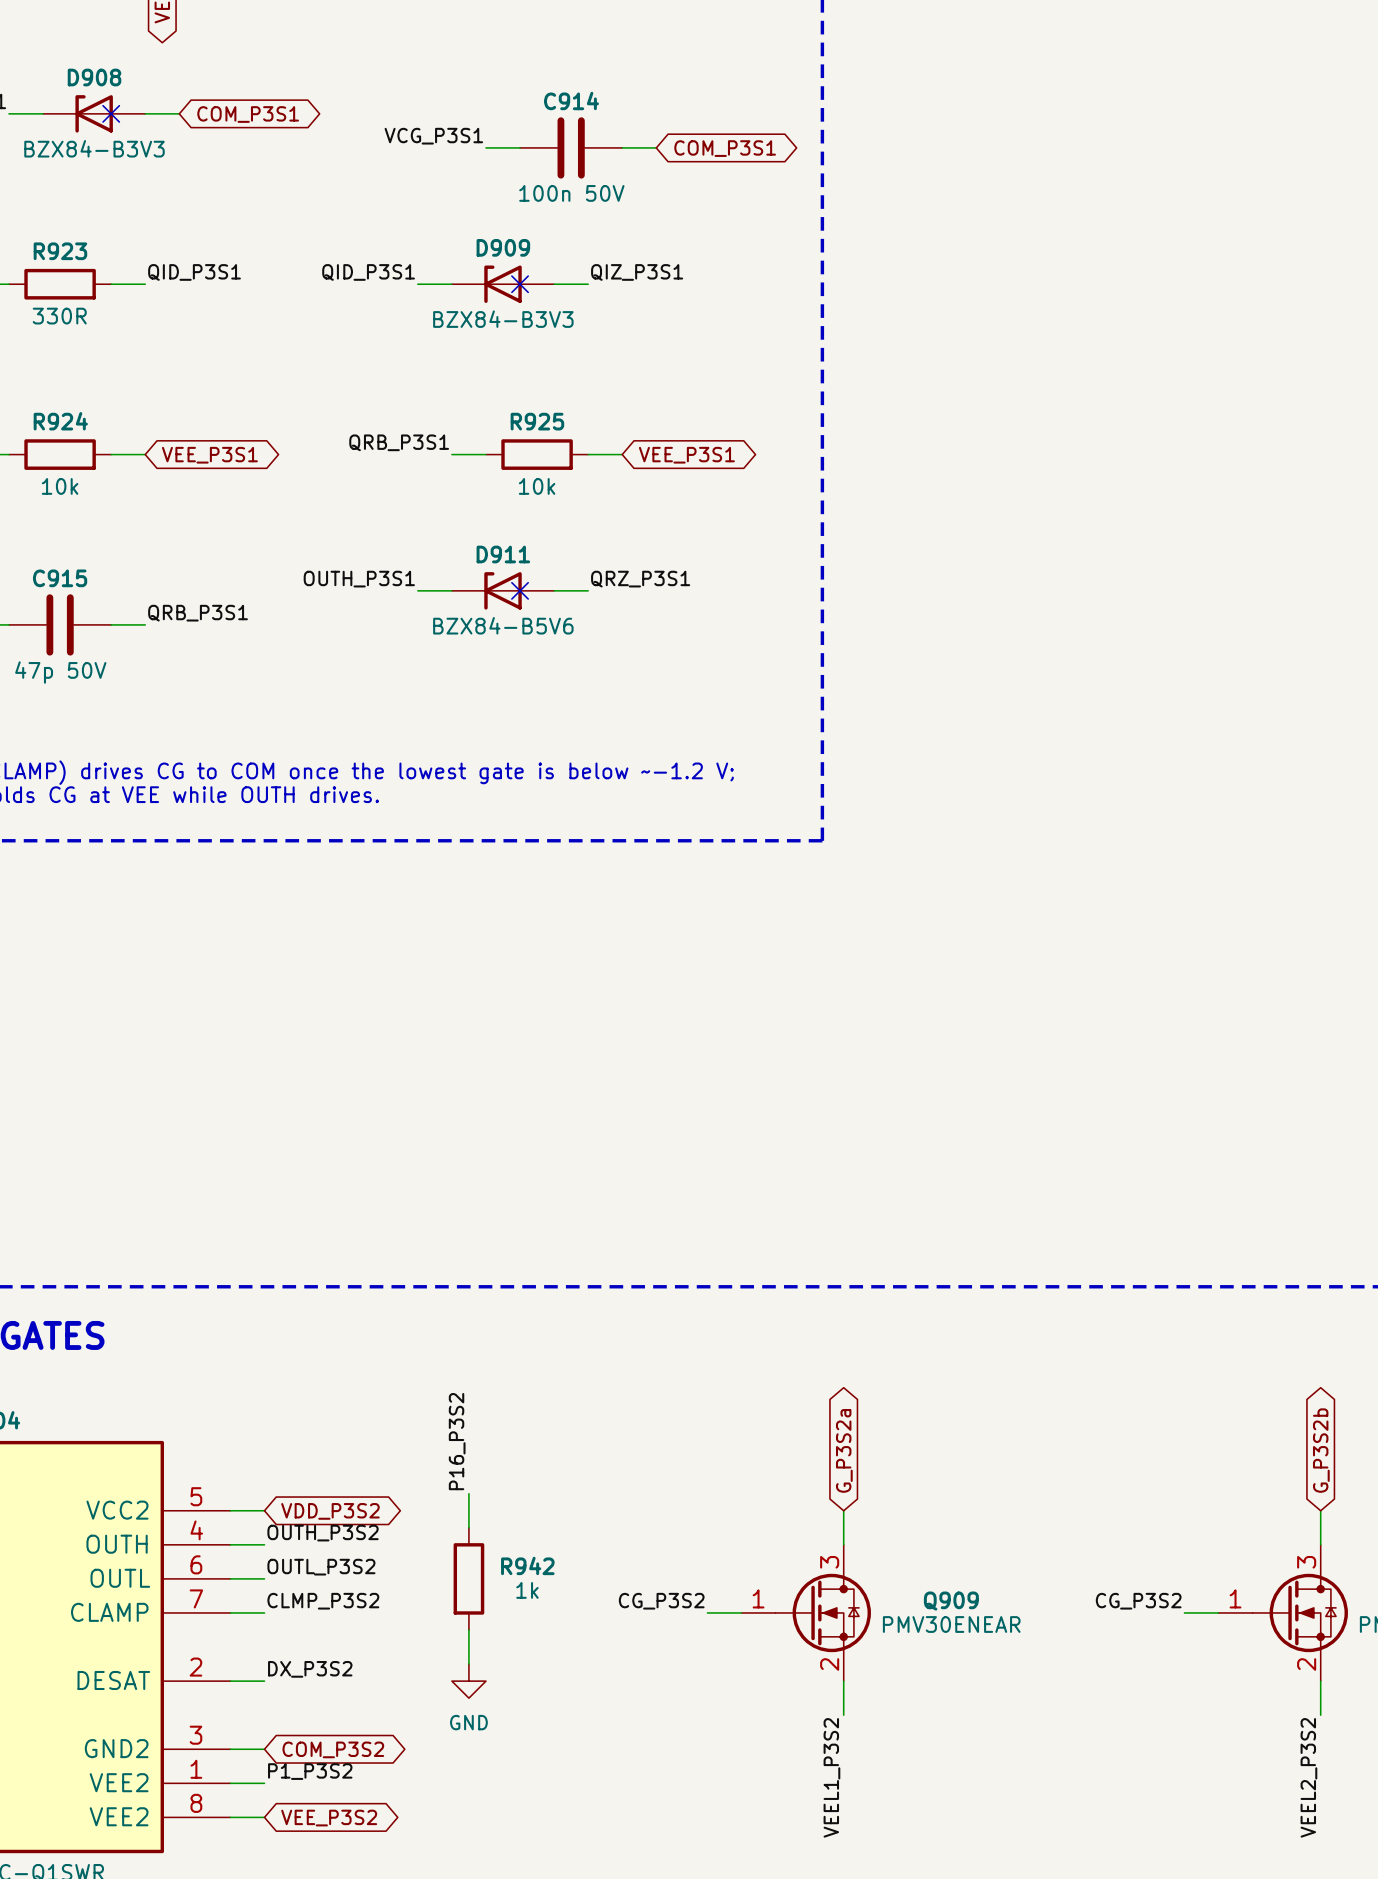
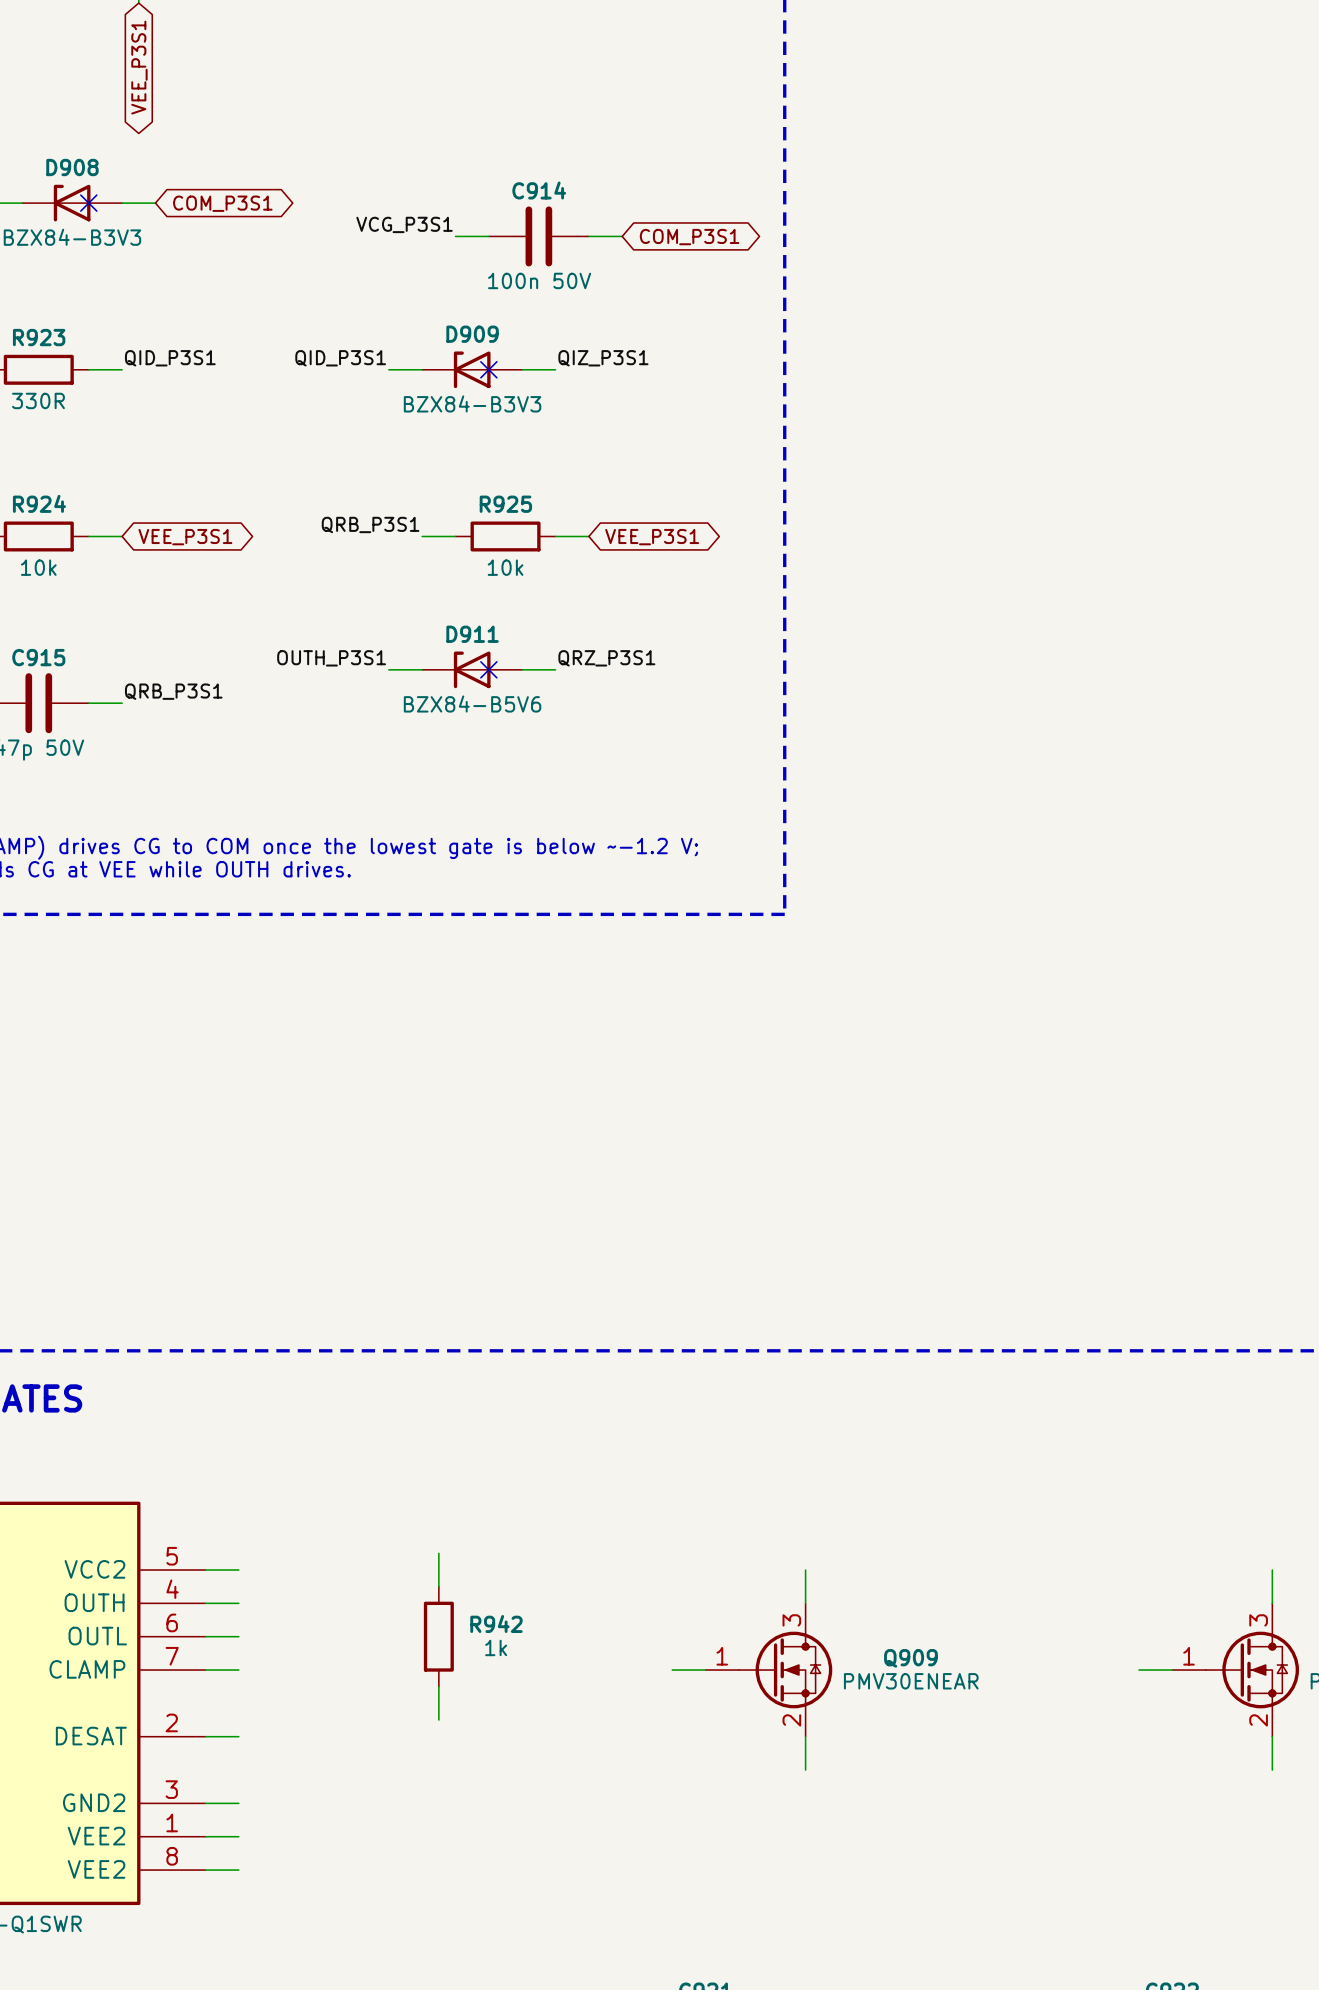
label: P16_P3S2 (457, 1441) -> none
global label: G_P3S2a (844, 1450) -> none
global label: G_P3S2b (1321, 1450) -> none
global label: VDD_P3S2 (330, 1511) -> none
label: OUTH_P3S2 (323, 1533) -> none
label: OUTL_P3S2 (321, 1567) -> none
label: CLMP_P3S2 (323, 1601) -> none
label: CG_P3S2 (661, 1601) -> none
label: CG_P3S2 (1138, 1601) -> none
label: DX_P3S2 (310, 1669) -> none
power symbol: GND (468, 1681) -> none
global label: COM_P3S2 (333, 1749) -> none
label: P1_P3S2 (310, 1771) -> none
label: VEEL1_P3S2 (831, 1777) -> none
label: VEEL2_P3S2 (1308, 1777) -> none
global label: VEE_P3S2 (329, 1818) -> none

